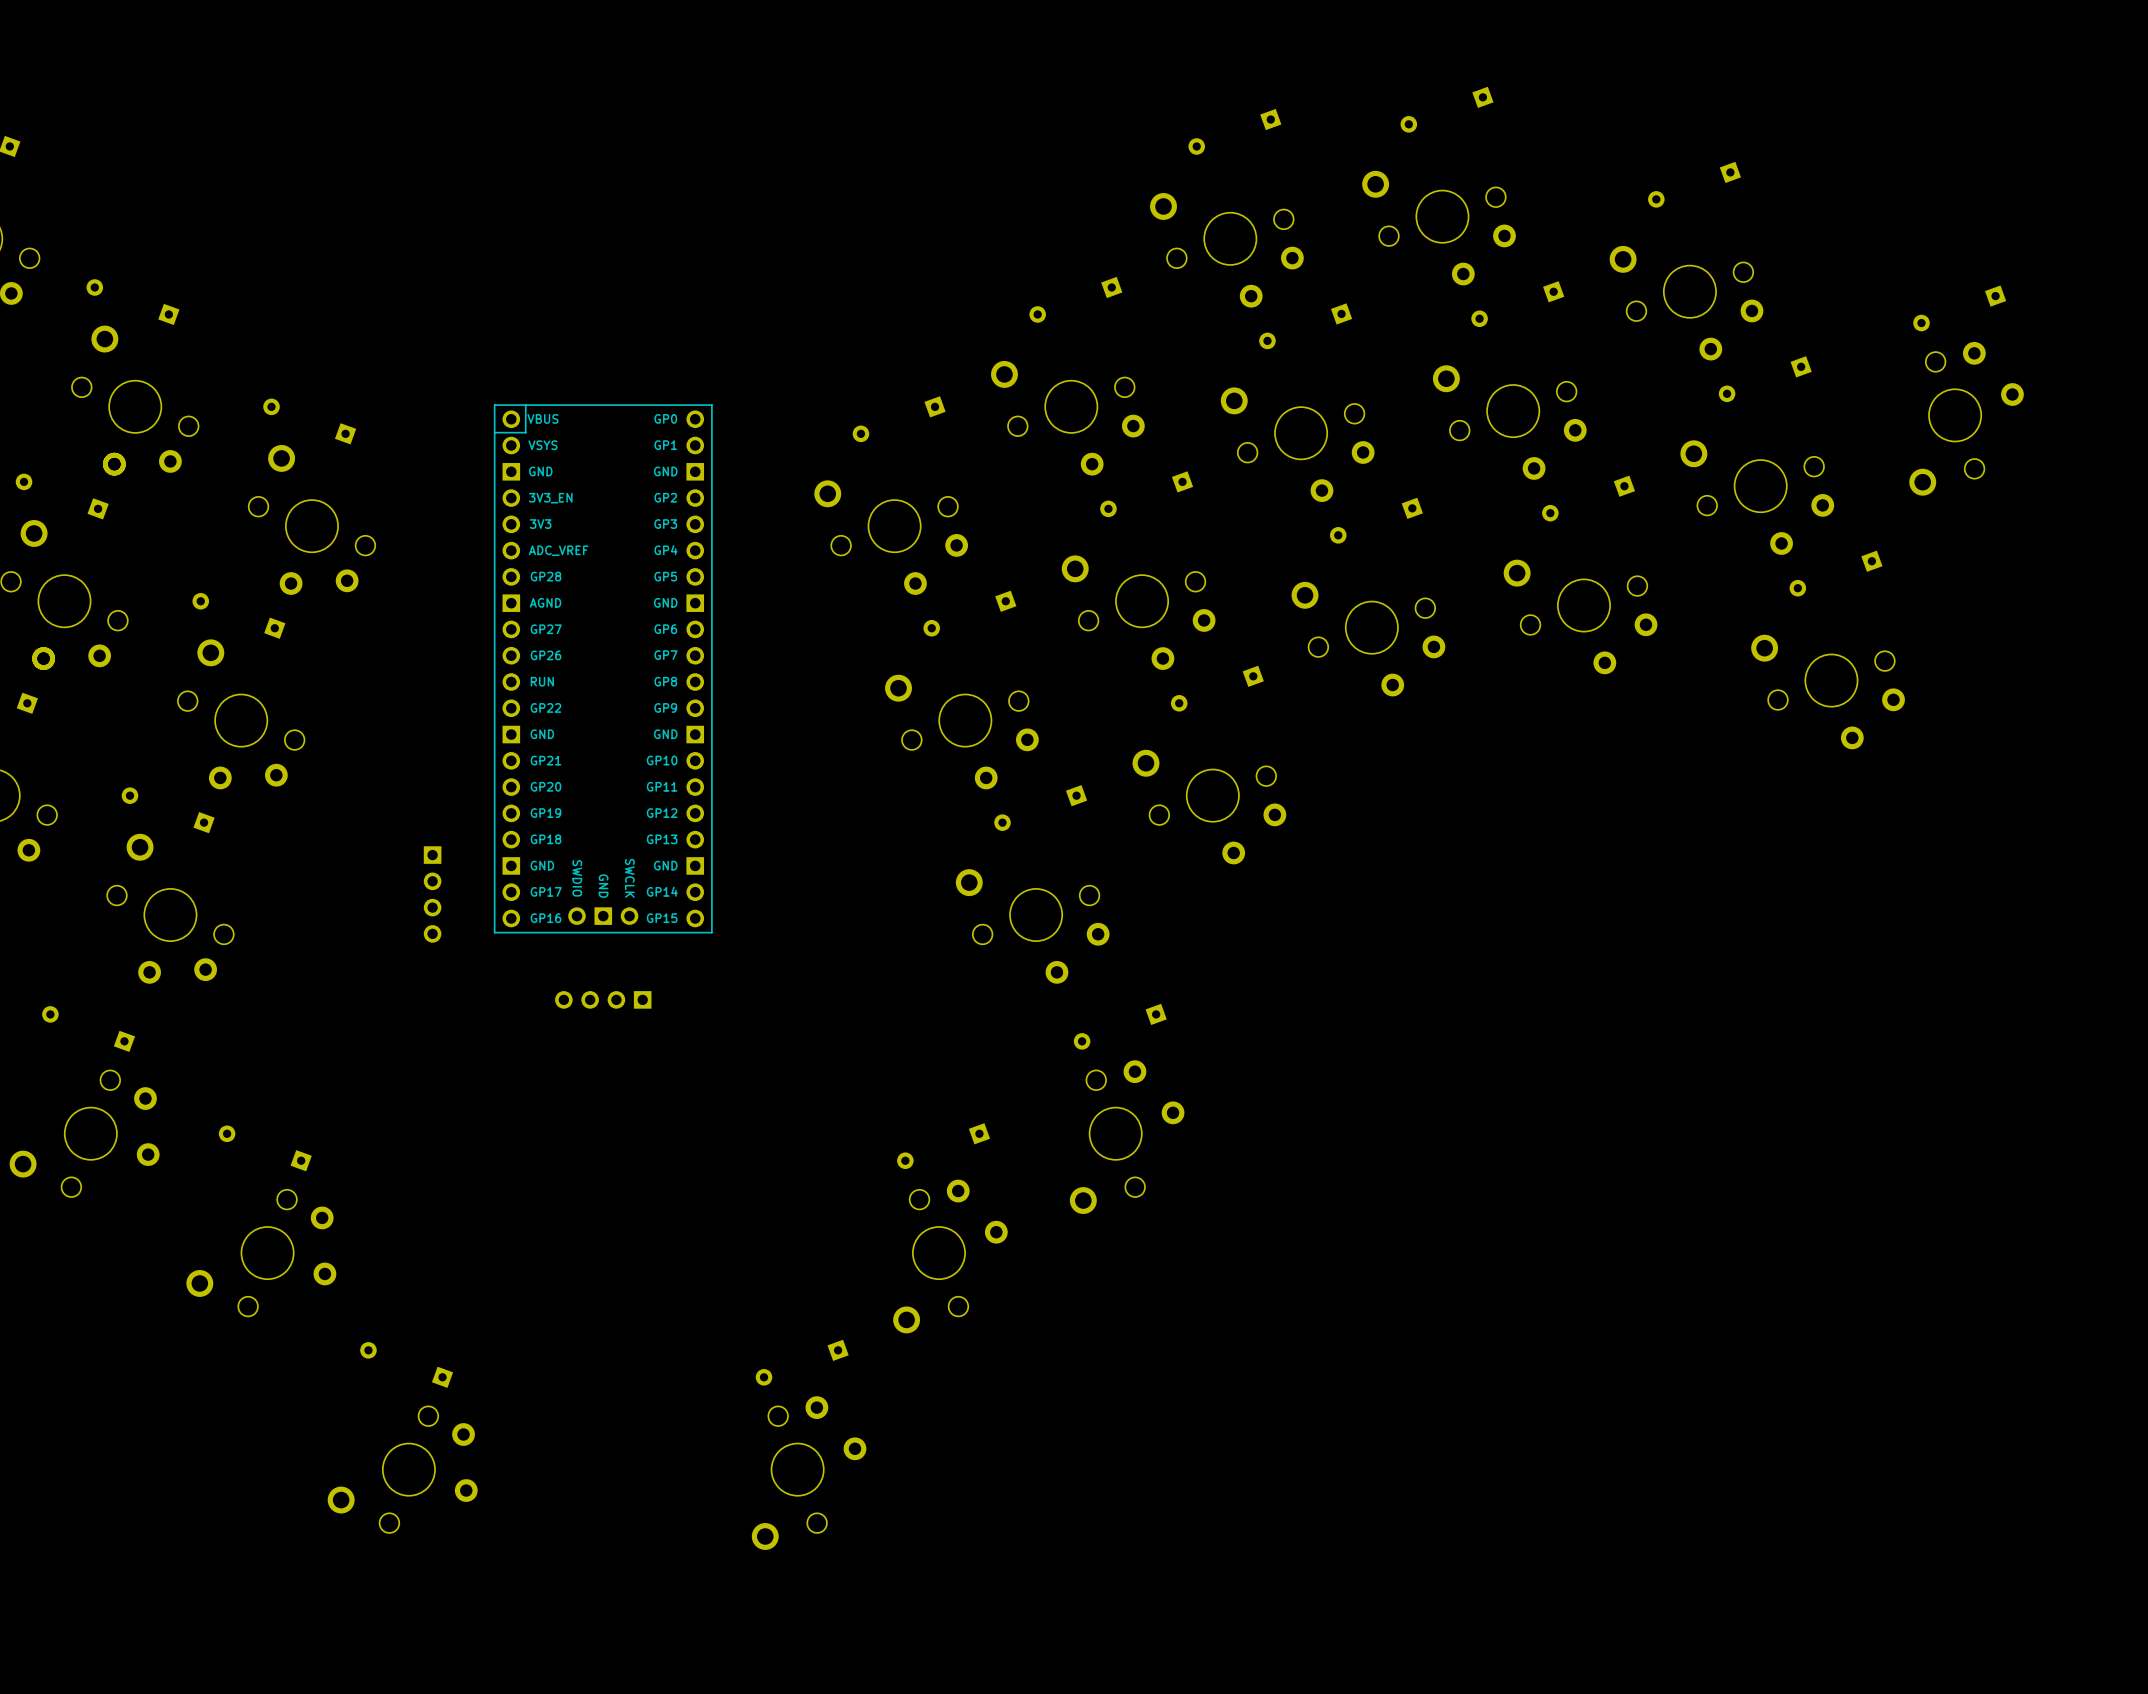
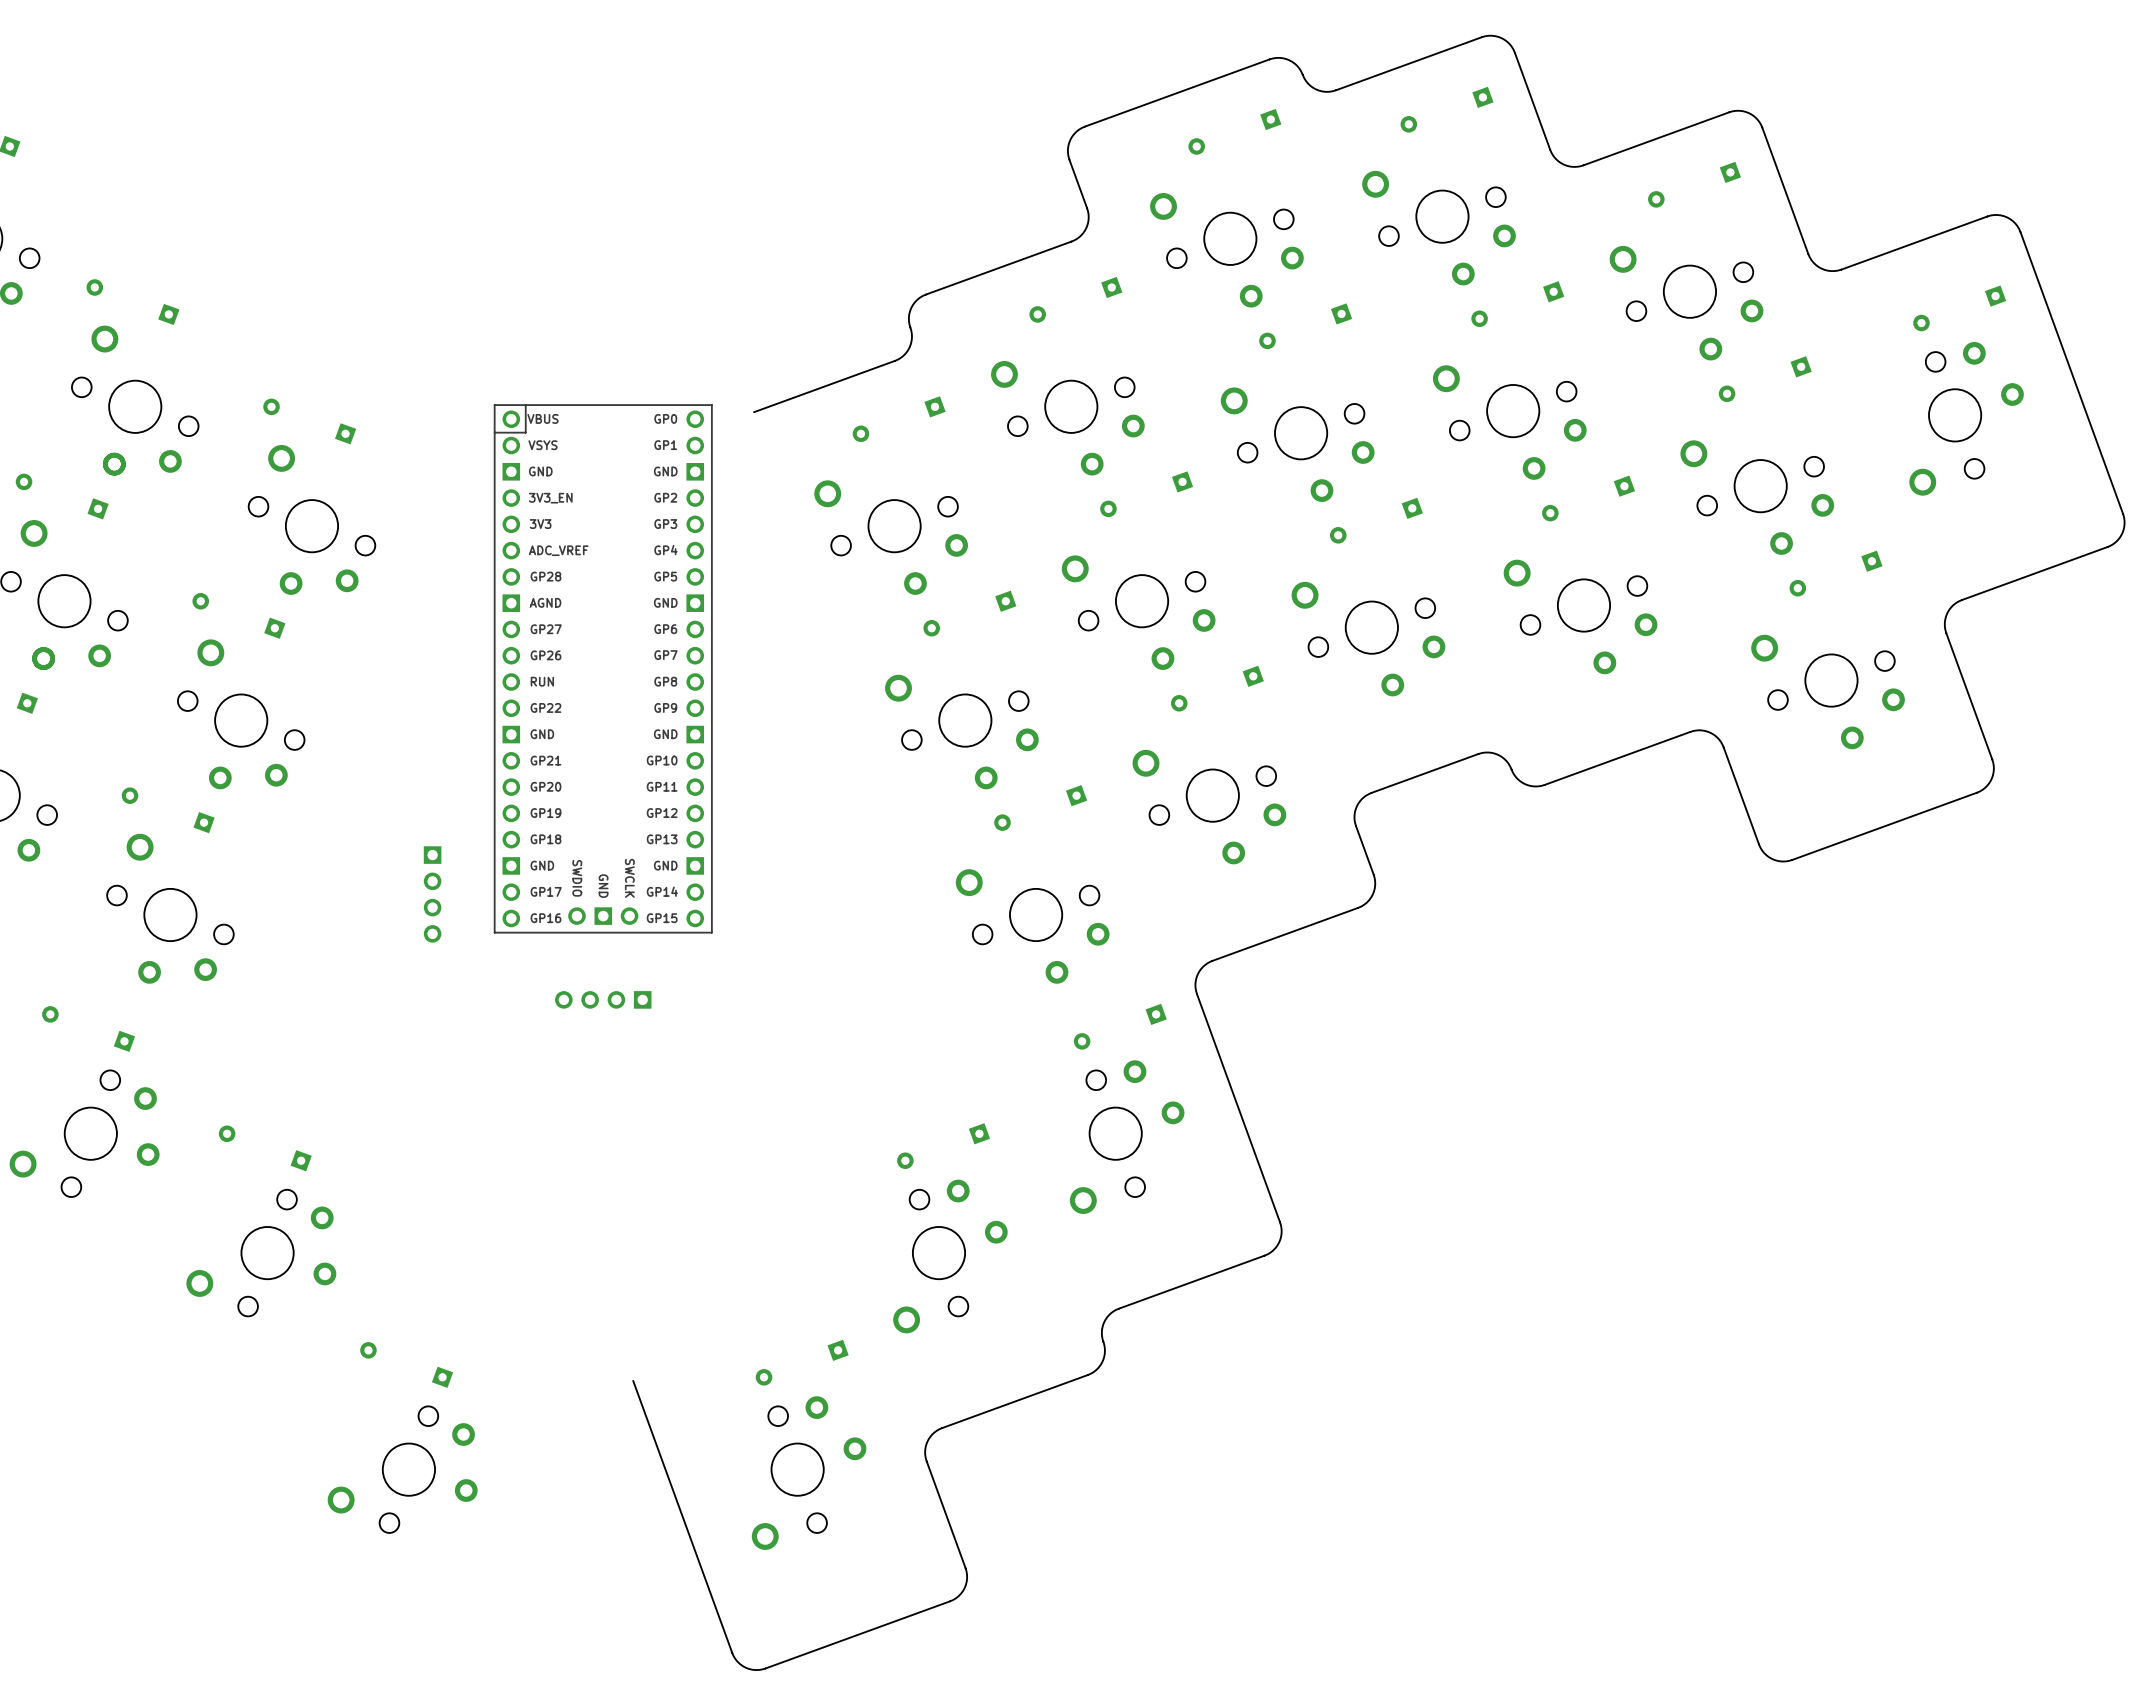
board edge: none -> (754, 412) (900, 358) (906, 352) (911, 342) (908, 321) (910, 311) (914, 302) (922, 295) (1079, 237) (1087, 225) (1088, 214) (1069, 159) (1067, 149) (1071, 137) (1081, 128) (1272, 58) (1282, 58) (1292, 61) (1299, 68) (1310, 85) (1319, 90) (1329, 91) (1481, 37) (1491, 35) (1504, 39) (1513, 49) (1551, 152) (1556, 159) (1566, 165) (1583, 165) (1731, 111) (1743, 111) (1753, 116) (1762, 127) (1809, 257) (1816, 265) (1824, 269) (1841, 269) (1990, 215) (2003, 216) (2012, 221) (2020, 231) (2123, 513) (2124, 523) (2120, 536) (2110, 545) (1961, 600) (1953, 605) (1947, 613) (1944, 623) (1946, 633) (1993, 762) (1993, 773) (1986, 786) (1976, 792) (1792, 859) (1775, 860) (1762, 850) (1722, 744) (1715, 735) (1701, 730) (1690, 731) (1541, 785) (1530, 785) (1522, 782) (1515, 777) (1503, 758) (1495, 753) (1484, 752) (1371, 792) (1361, 799) (1355, 809) (1354, 820) (1374, 877) (1374, 891) (1369, 900) (1358, 907) (1209, 962) (1200, 969) (1196, 979) (1196, 994) (1280, 1222) (1281, 1232) (1279, 1242) (1273, 1250) (1264, 1255) (1113, 1311) (1107, 1317) (1102, 1327) (1104, 1350) (1103, 1358) (1099, 1366) (1090, 1373) (942, 1428) (932, 1434) (925, 1446) (925, 1458) (967, 1574) (964, 1587) (953, 1599) (765, 1668) (755, 1670) (742, 1666) (732, 1653) (633, 1380)

